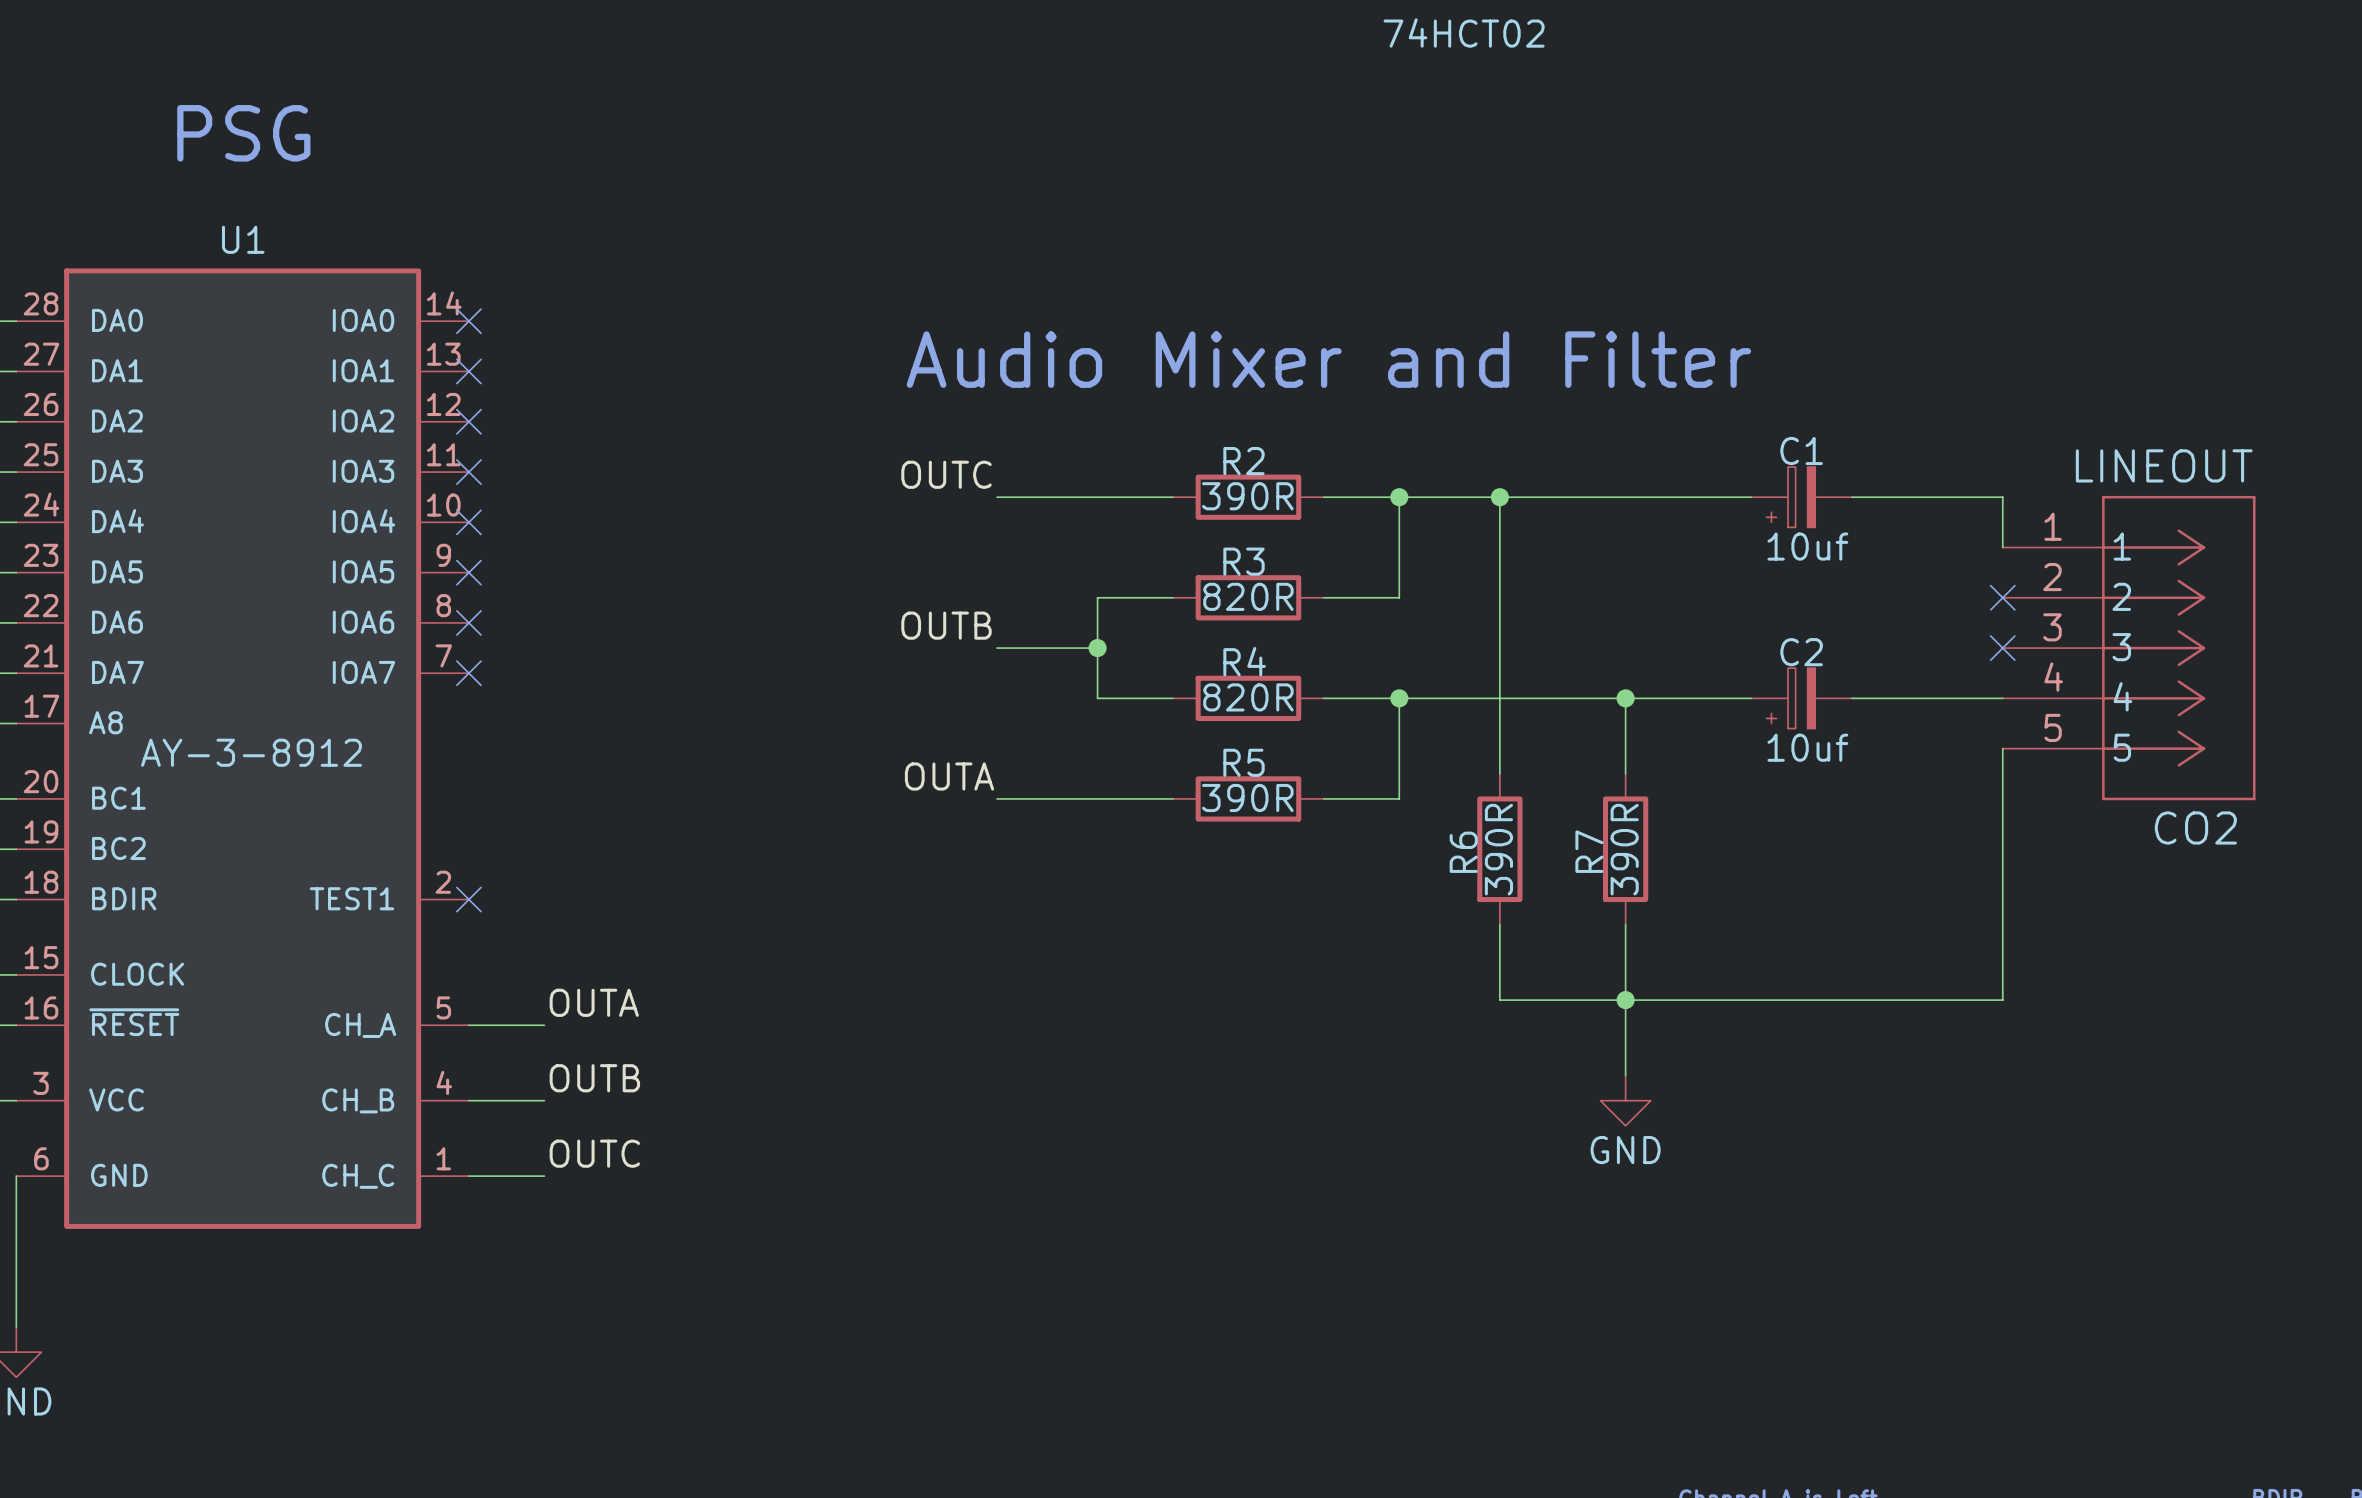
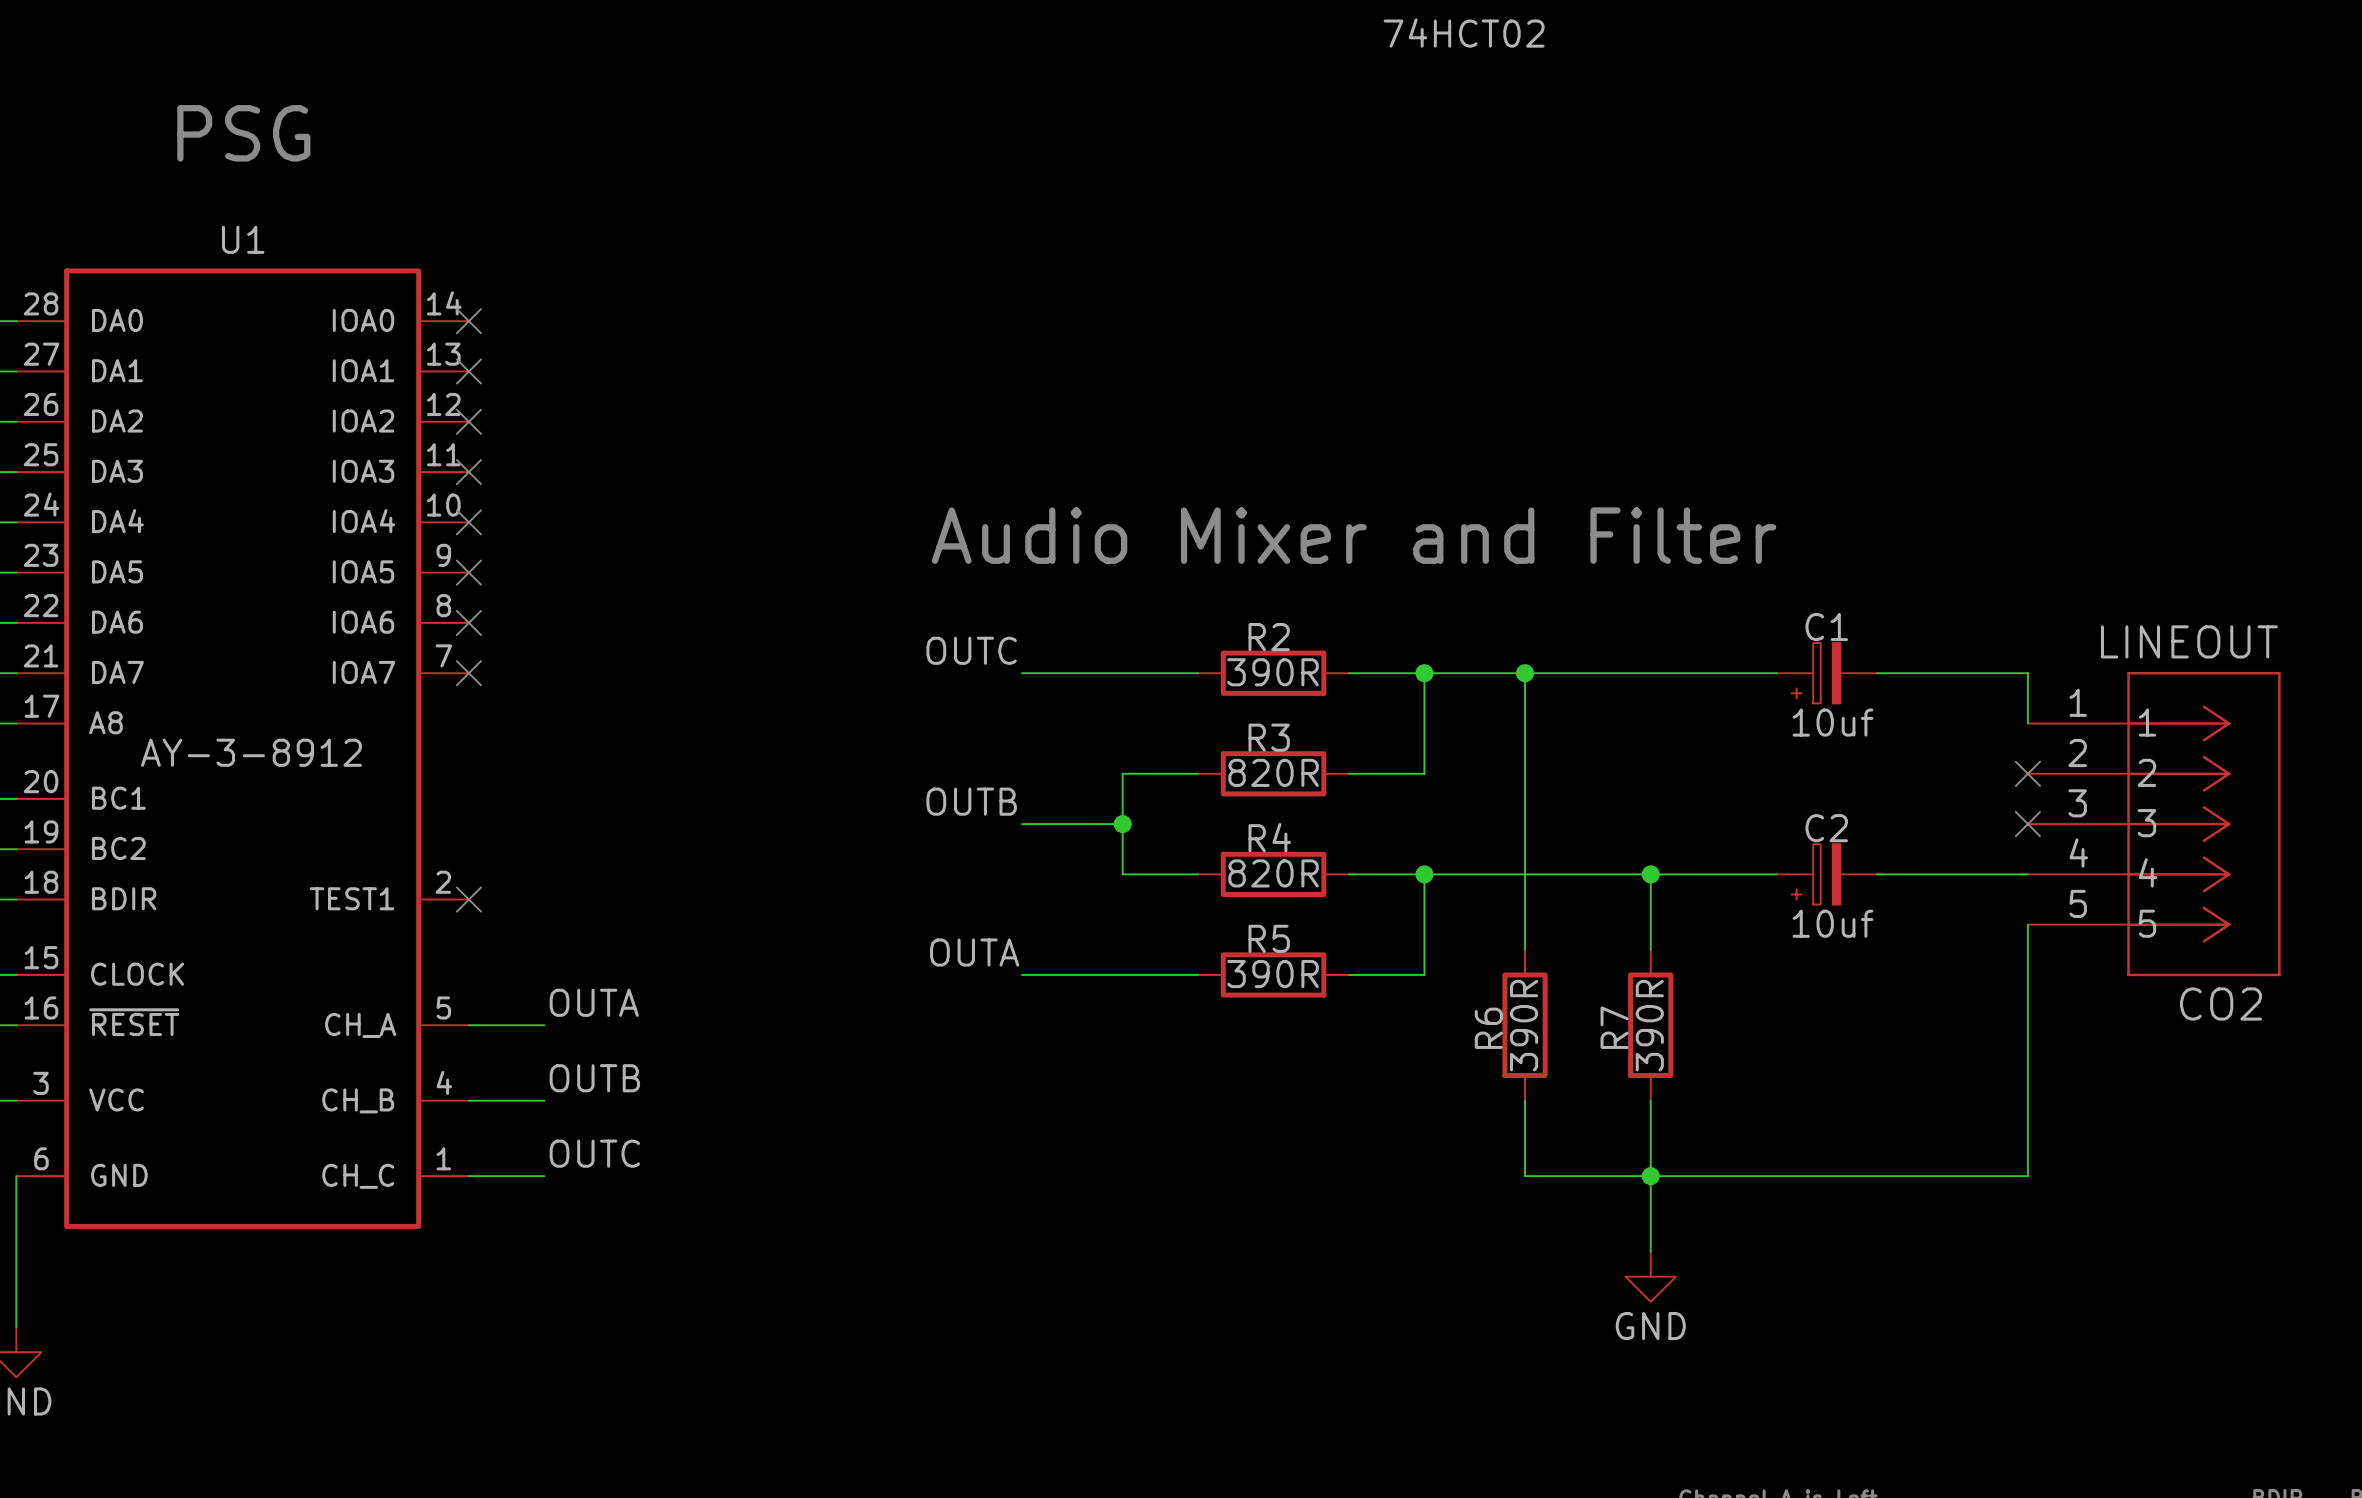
text position: Audio Mixer and Filter (1328, 359) -> Audio Mixer and Filter (1354, 535)
label position: OUTC (946, 474) -> OUTC (971, 650)
wire: (996, 497) (1173, 497) -> (1022, 673) (1198, 673)
R2 position: (1248, 497) -> (1273, 673)
wire: (1323, 497) (1751, 497) -> (1349, 673) (1776, 673)
wire: (1399, 497) (1399, 597) (1323, 597) -> (1424, 673) (1424, 773) (1349, 773)
junction: (1399, 497) -> none
wire: (1499, 497) (1499, 773) -> (1525, 673) (1525, 949)
junction: (1499, 497) -> none
C1 position: (1801, 497) -> (1826, 673)
wire: (1851, 497) (2002, 497) (2002, 547) -> (1877, 673) (2027, 673) (2027, 723)
wire: (1173, 597) (1097, 597) (1097, 698) (1173, 698) -> (1198, 773) (1122, 773) (1122, 874) (1198, 874)
R3 position: (1248, 597) -> (1273, 773)
no-connect mark: (2002, 597) -> none
label position: OUTB (946, 625) -> OUTB (971, 801)
wire: (996, 648) (1097, 648) -> (1022, 824) (1122, 824)
junction: (1097, 648) -> none
no-connect mark: (2002, 648) -> none
CO2 position: (2129, 648) -> (2154, 824)
junction: none -> (1525, 673)
R4 position: (1248, 698) -> (1273, 874)
wire: (1323, 698) (1751, 698) -> (1349, 874) (1776, 874)
wire: (1399, 698) (1399, 798) (1323, 798) -> (1424, 874) (1424, 974) (1349, 974)
junction position: (1399, 698) -> (1424, 673)
wire: (1625, 698) (1625, 773) -> (1650, 874) (1650, 949)
junction: (1625, 698) -> none
C2 position: (1801, 698) -> (1826, 874)
wire: (1851, 698) (2002, 698) -> (1877, 874) (2027, 874)
wire: (2002, 748) (2002, 1000) (1499, 1000) (1499, 924) -> (2027, 924) (2027, 1176) (1525, 1176) (1525, 1100)
no-connect mark: none -> (2027, 773)
label position: OUTA (949, 776) -> OUTA (974, 952)
wire: (996, 798) (1173, 798) -> (1022, 974) (1198, 974)
R5 position: (1248, 798) -> (1273, 974)
junction: none -> (1122, 824)
no-connect mark: none -> (2027, 824)
R6 position: (1499, 849) -> (1525, 1025)
R7 position: (1625, 849) -> (1650, 1025)
junction: none -> (1424, 874)
junction: none -> (1650, 874)
wire: (1625, 924) (1625, 1075) -> (1650, 1100) (1650, 1251)
junction: (1625, 1000) -> none
power symbol position: GND (1625, 1100) -> GND (1650, 1276)
junction: none -> (1650, 1176)

